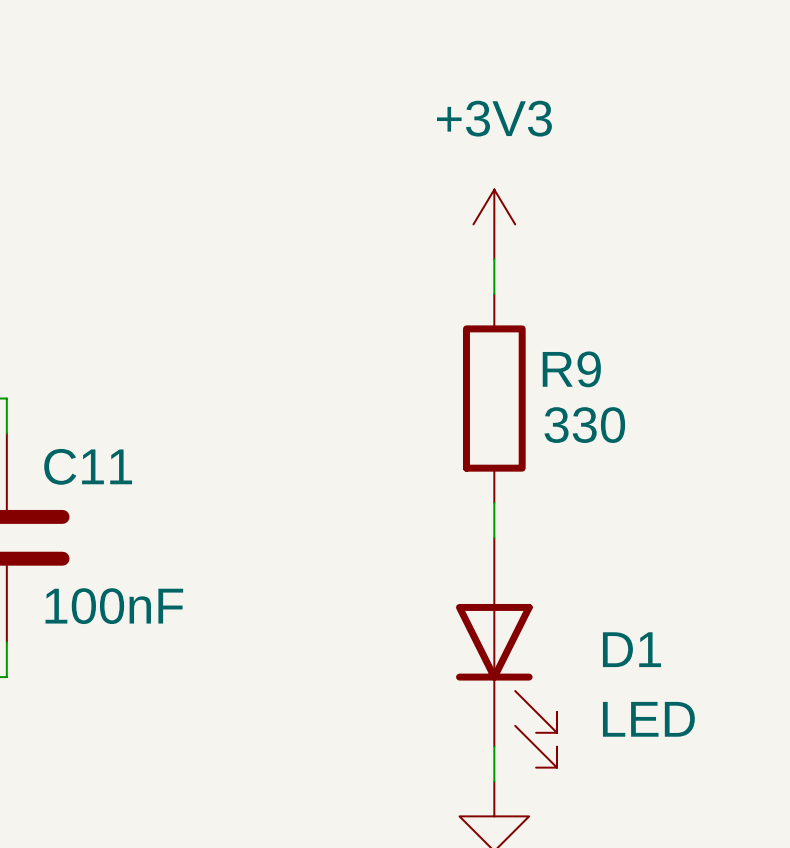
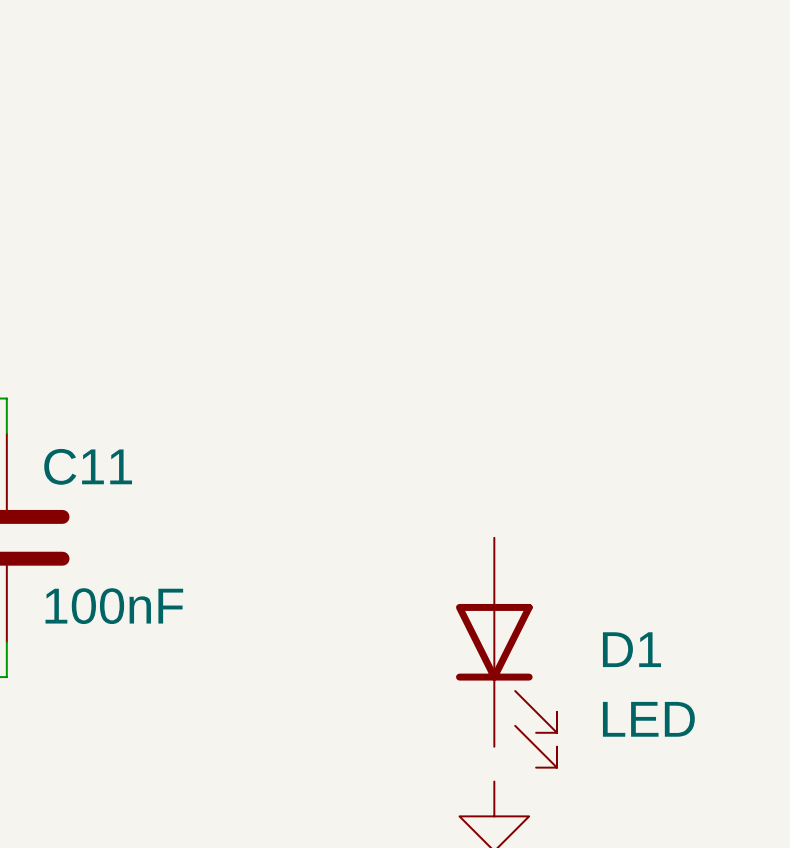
power symbol: +3V3 (494, 224) -> none
wire: (494, 259) (494, 294) -> none
R9: 330 (494, 398) -> none
wire: (494, 502) (494, 537) -> none
wire: (494, 746) (494, 781) -> none

